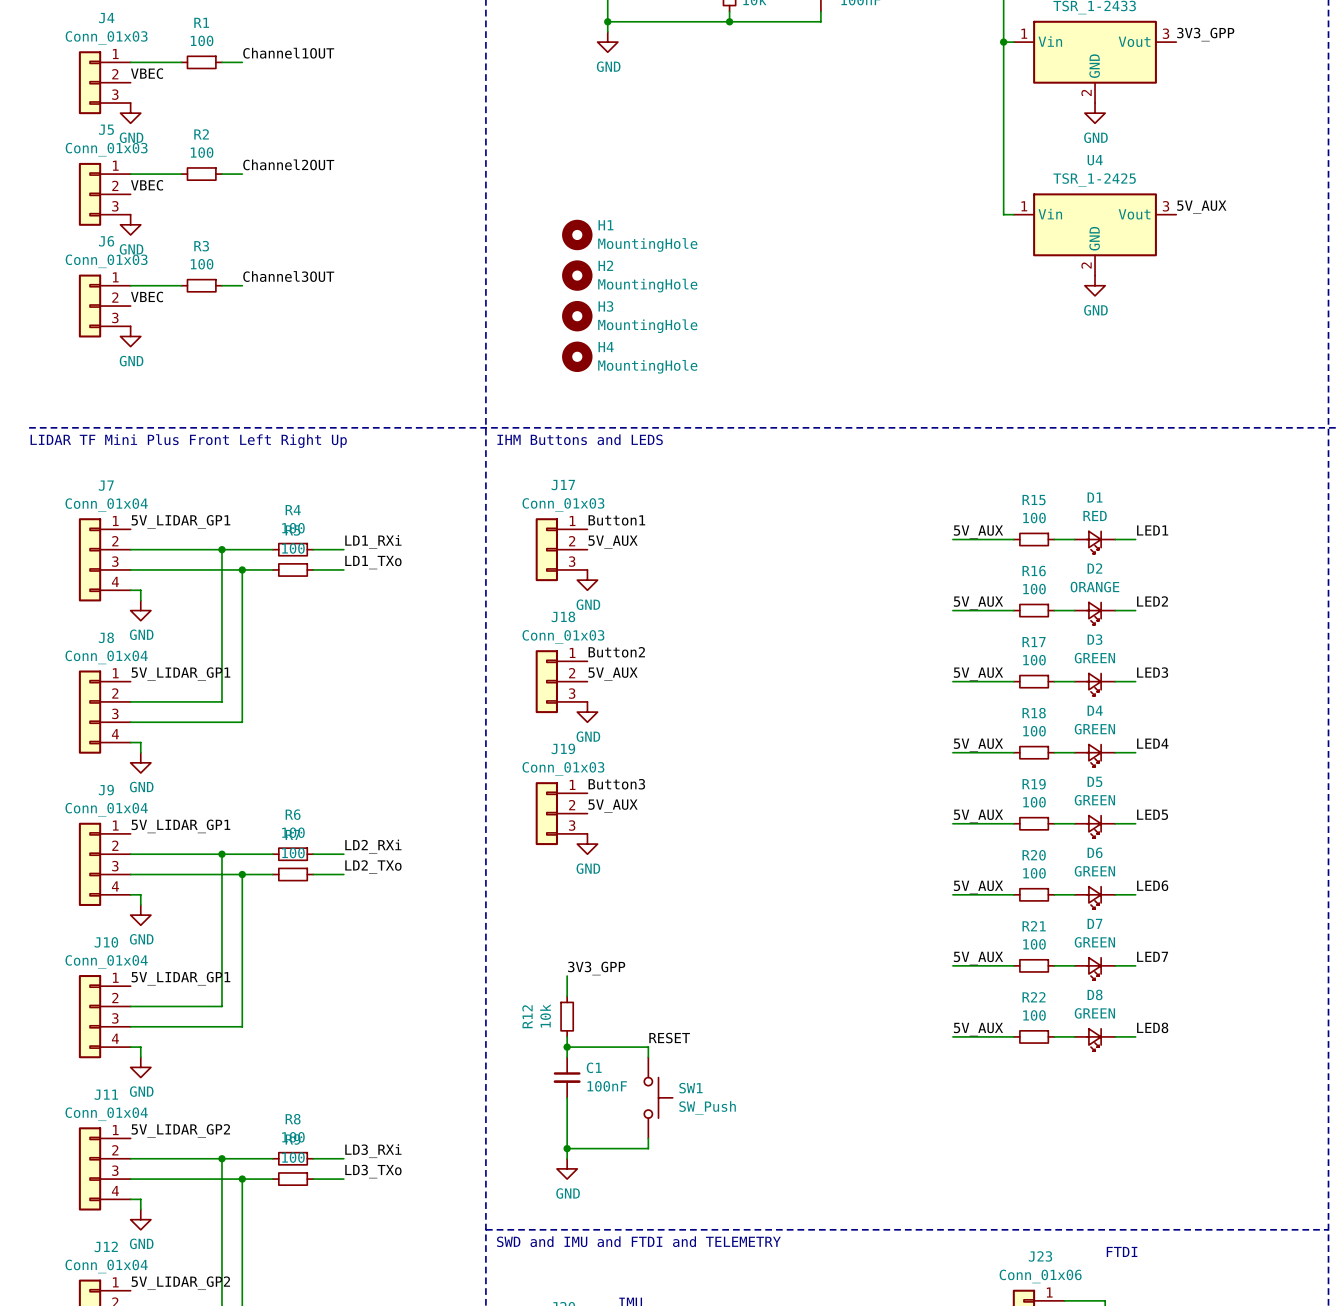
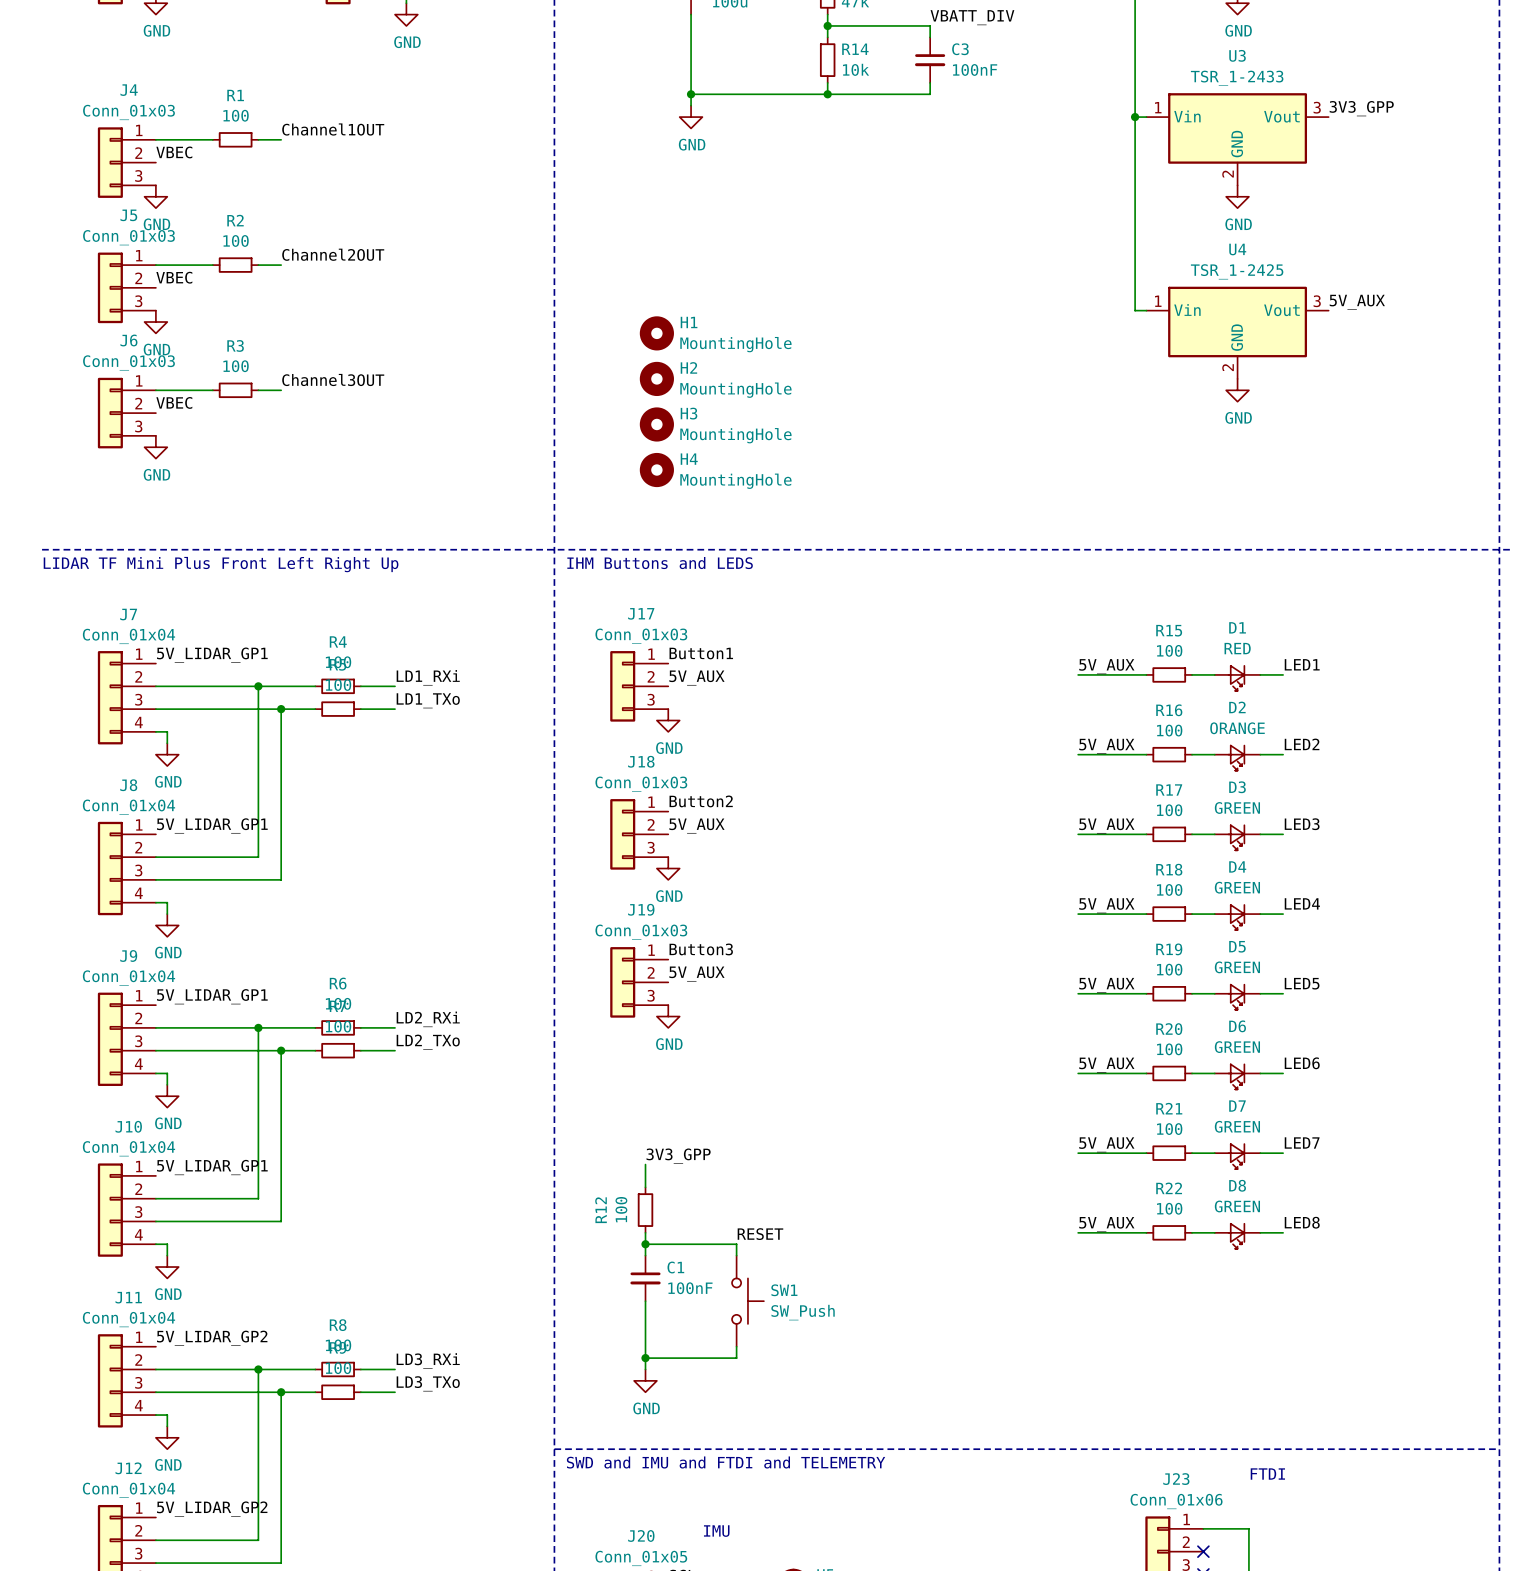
R12 value: 10k (545, 1015) -> 100 (621, 1209)

